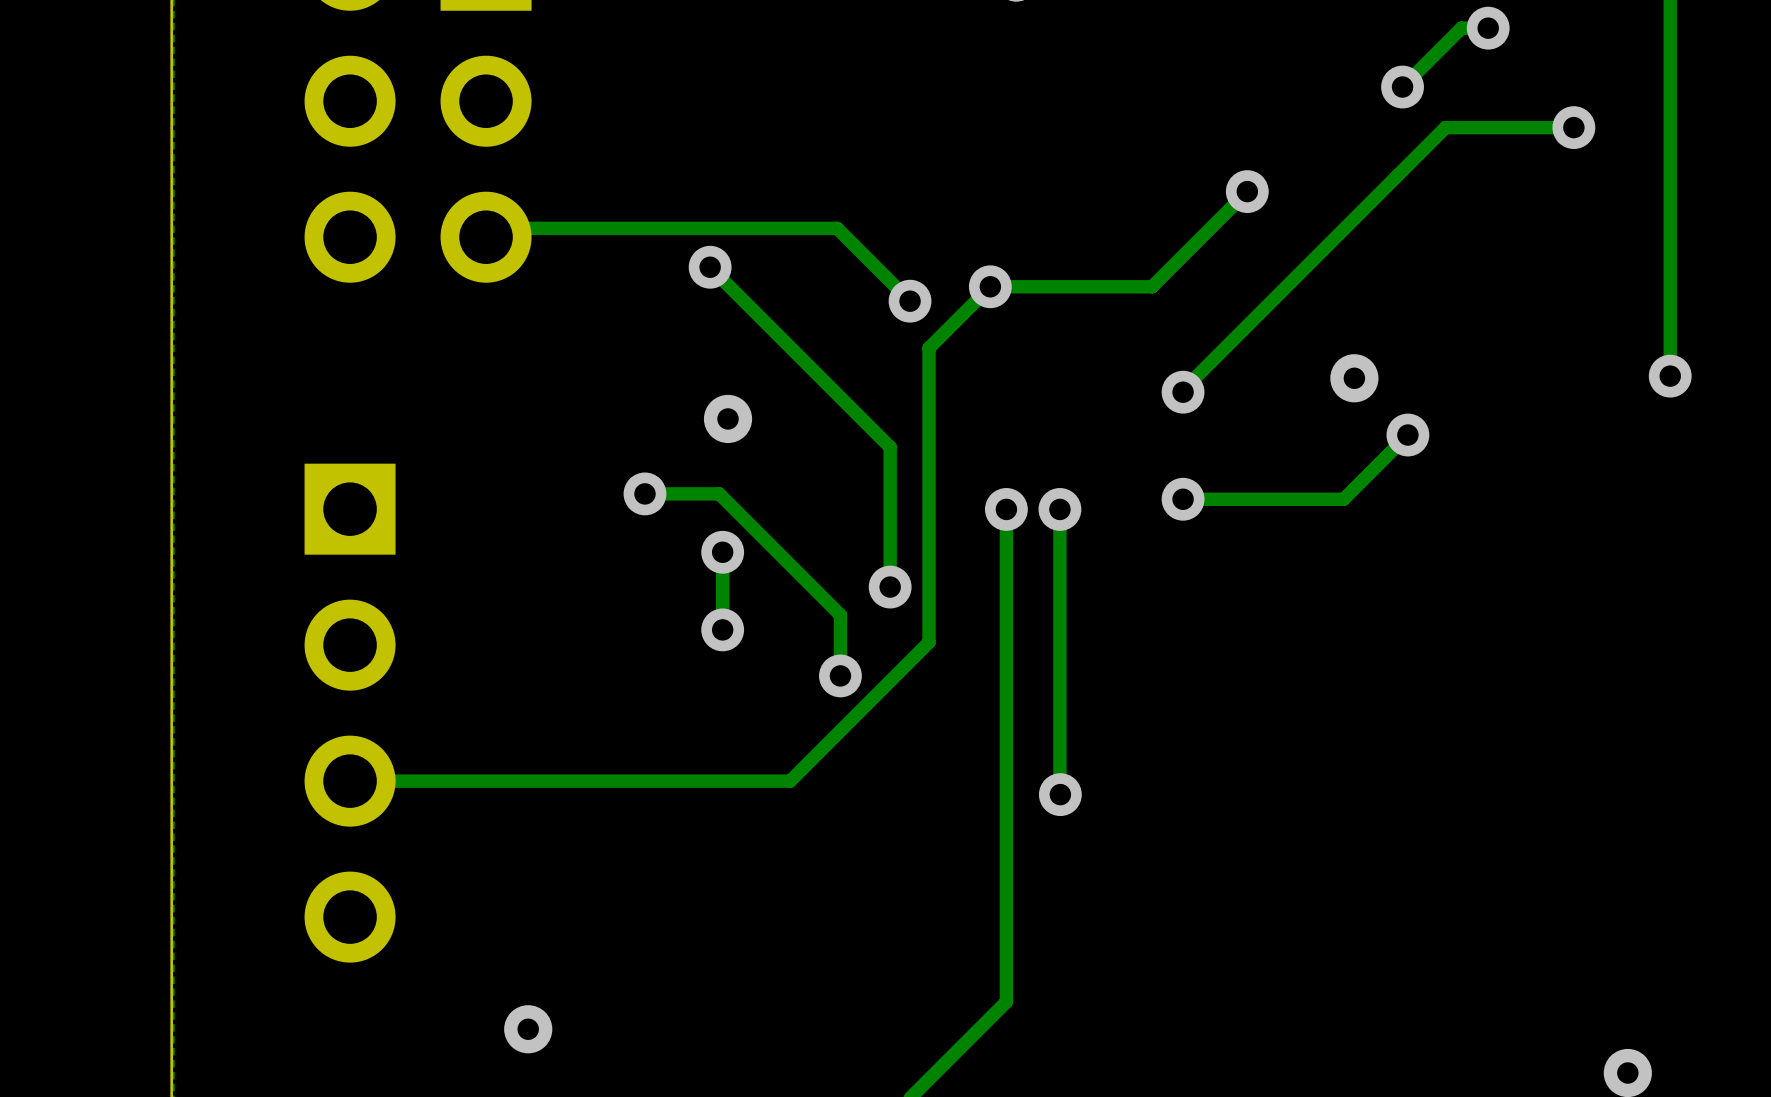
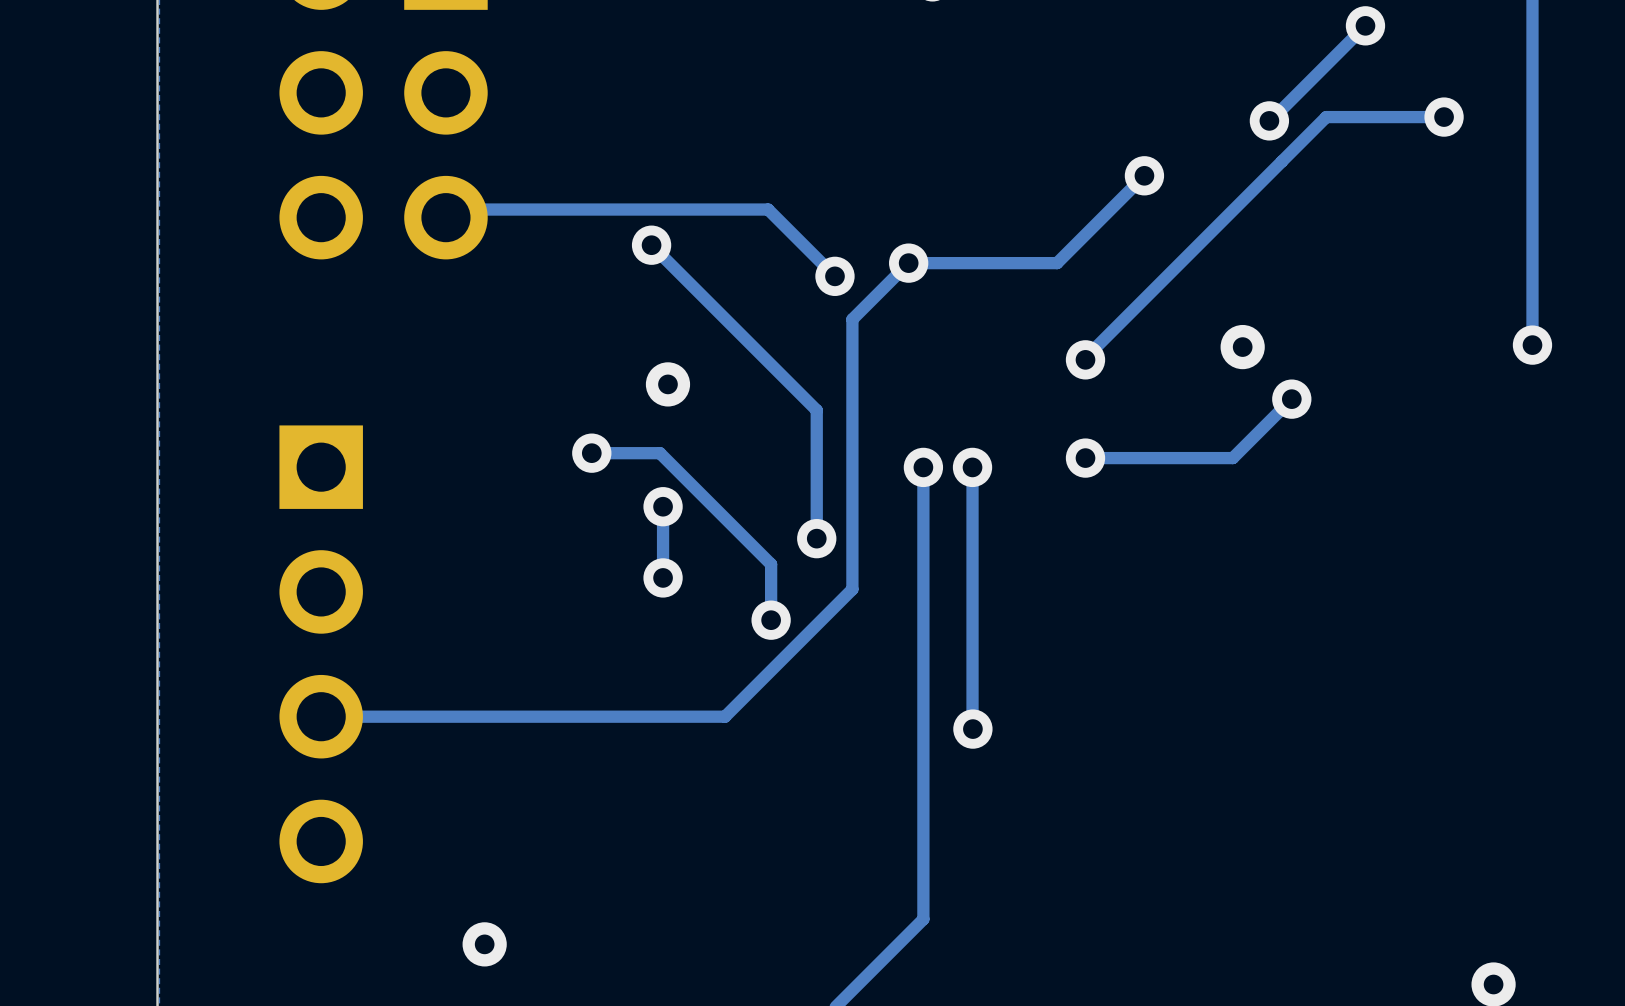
track: (1488, 28) (1461, 28) (1402, 87) -> (1365, 25) (1269, 120)
via position: (1402, 87) -> (1269, 120)

